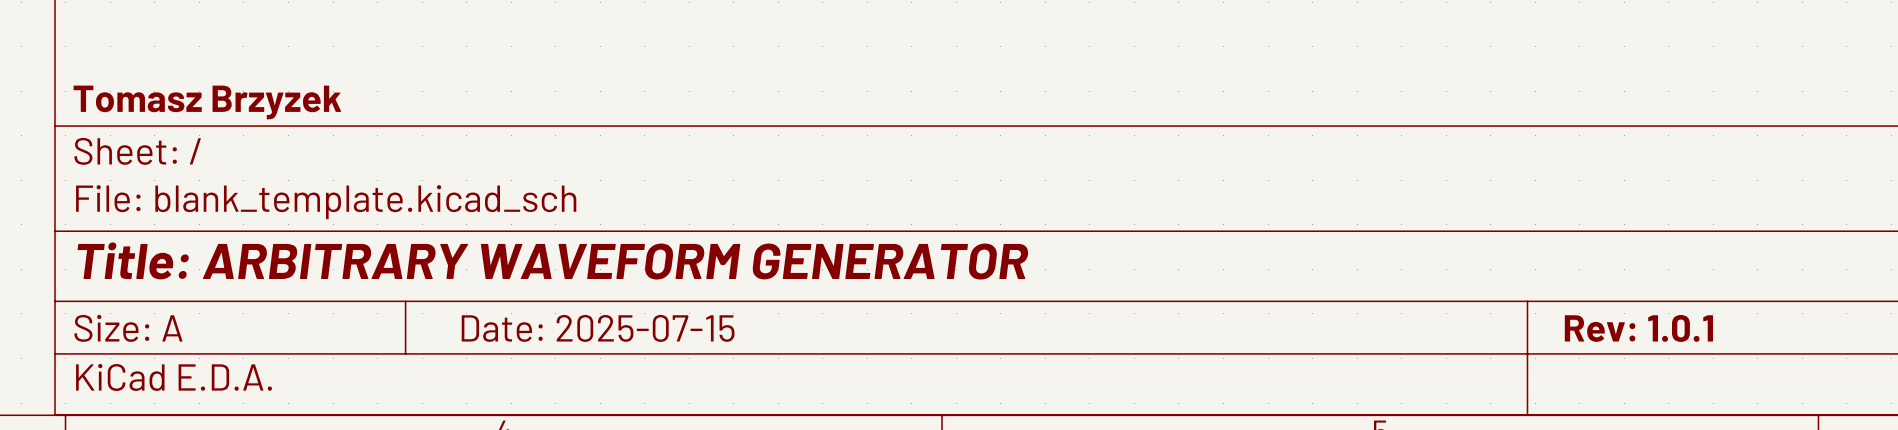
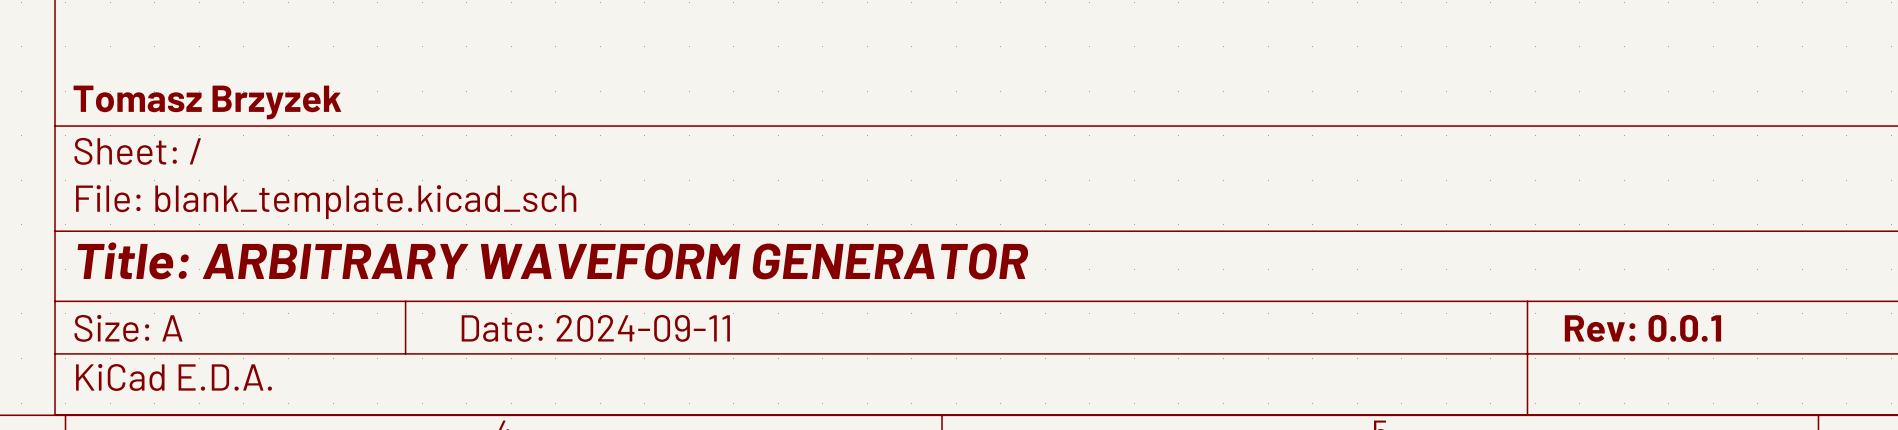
title block: Date: 2025-07-15 (598, 328) -> Date: 2024-09-11 (595, 328)
title block: Rev: 1.0.1 (1638, 328) -> Rev: 0.0.1 (1642, 328)

